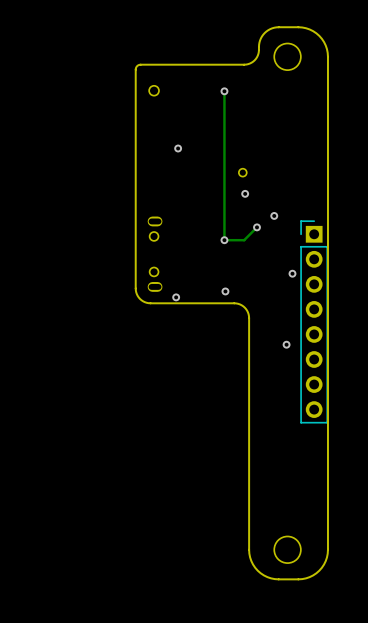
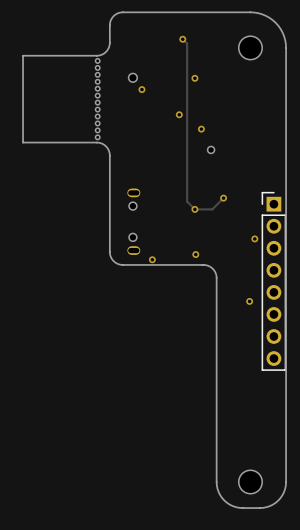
via: none -> (182, 39)
board edge: (327, 56) (324, 42) (313, 31) (302, 27) (278, 27) (270, 29) (263, 34) (259, 42) (256, 57) (248, 64) (140, 64) (136, 66) (135, 288) (140, 298) (150, 303) -> (286, 47) (284, 36) (278, 25) (269, 17) (258, 13) (122, 12) (116, 14) (111, 18) (109, 46) (101, 54) (23, 55) (23, 142) (96, 142) (107, 147) (109, 155) (109, 253) (116, 263) (129, 264)
track: (224, 91) (224, 240) -> (182, 39) (187, 43) (187, 201) (194, 209)
via: none -> (141, 89)
part: none -> (97, 99)
via: none -> (179, 114)
via: (178, 148) -> none
via: none -> (201, 129)
via: (245, 193) -> none
via: (274, 215) -> none

